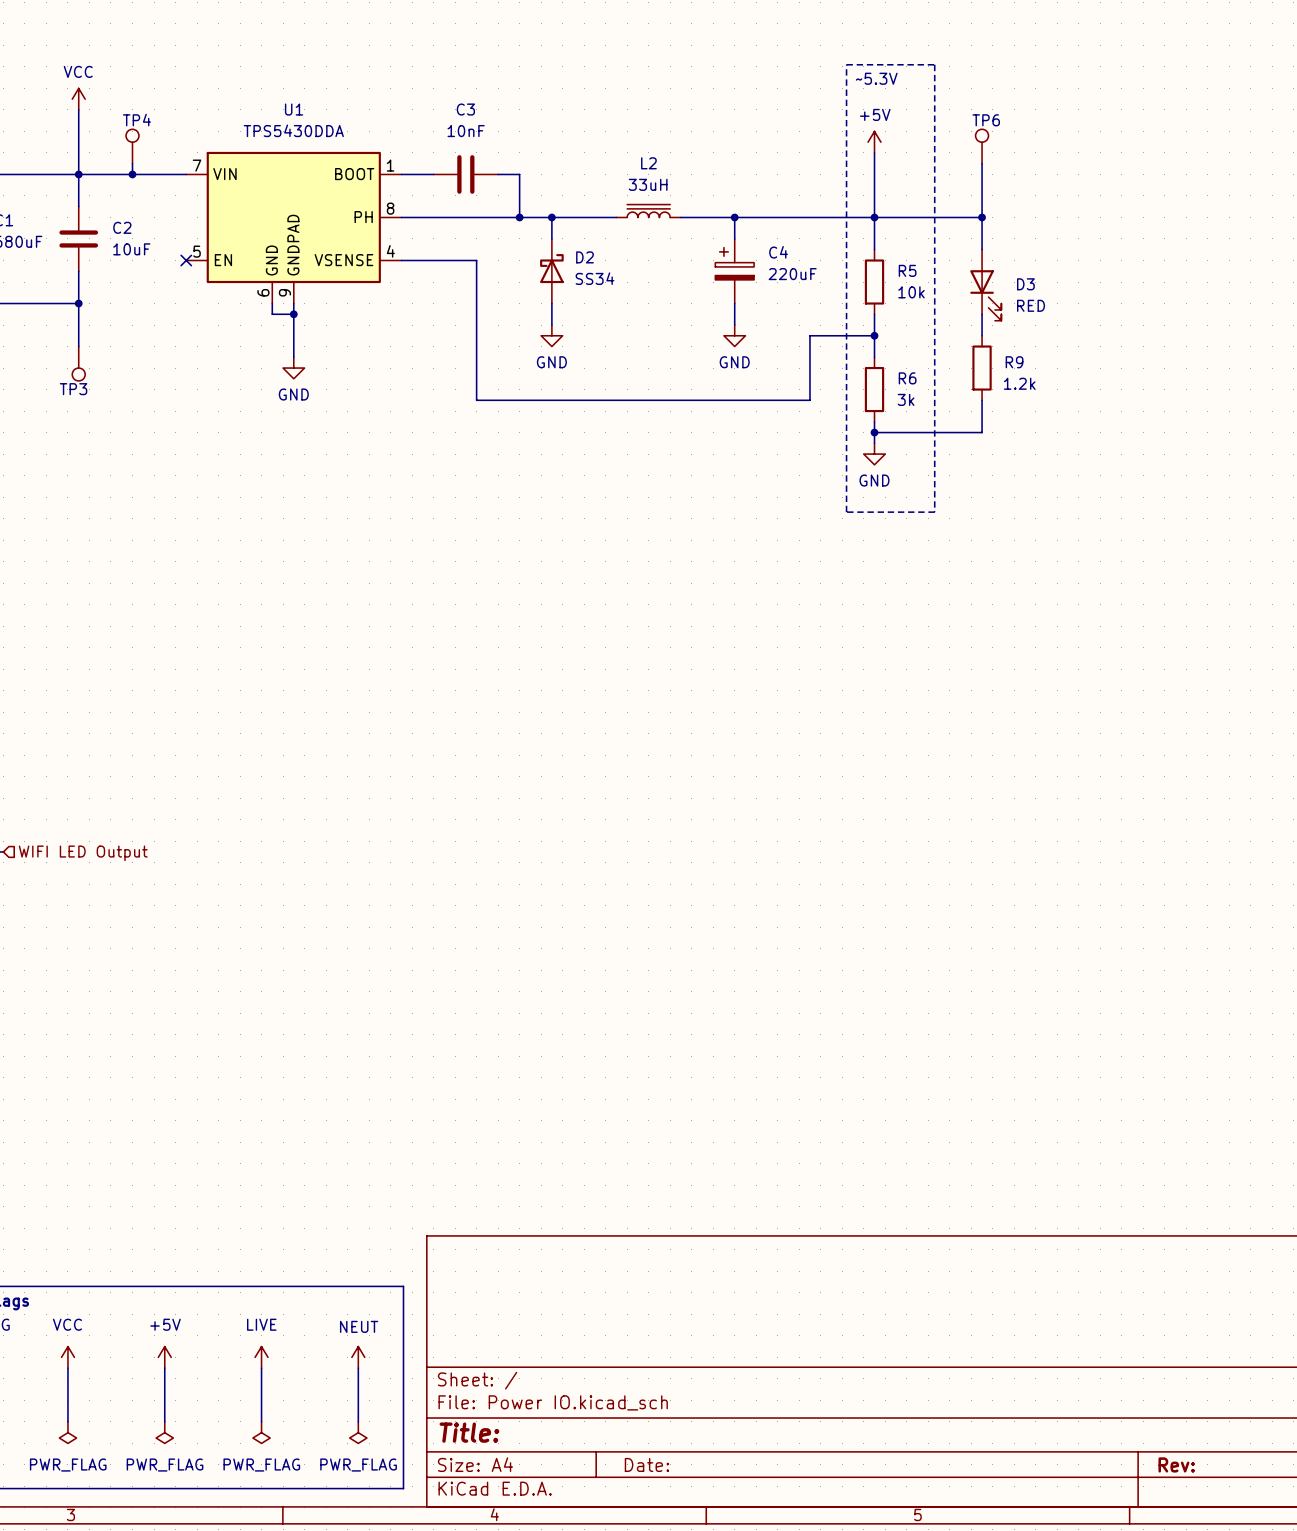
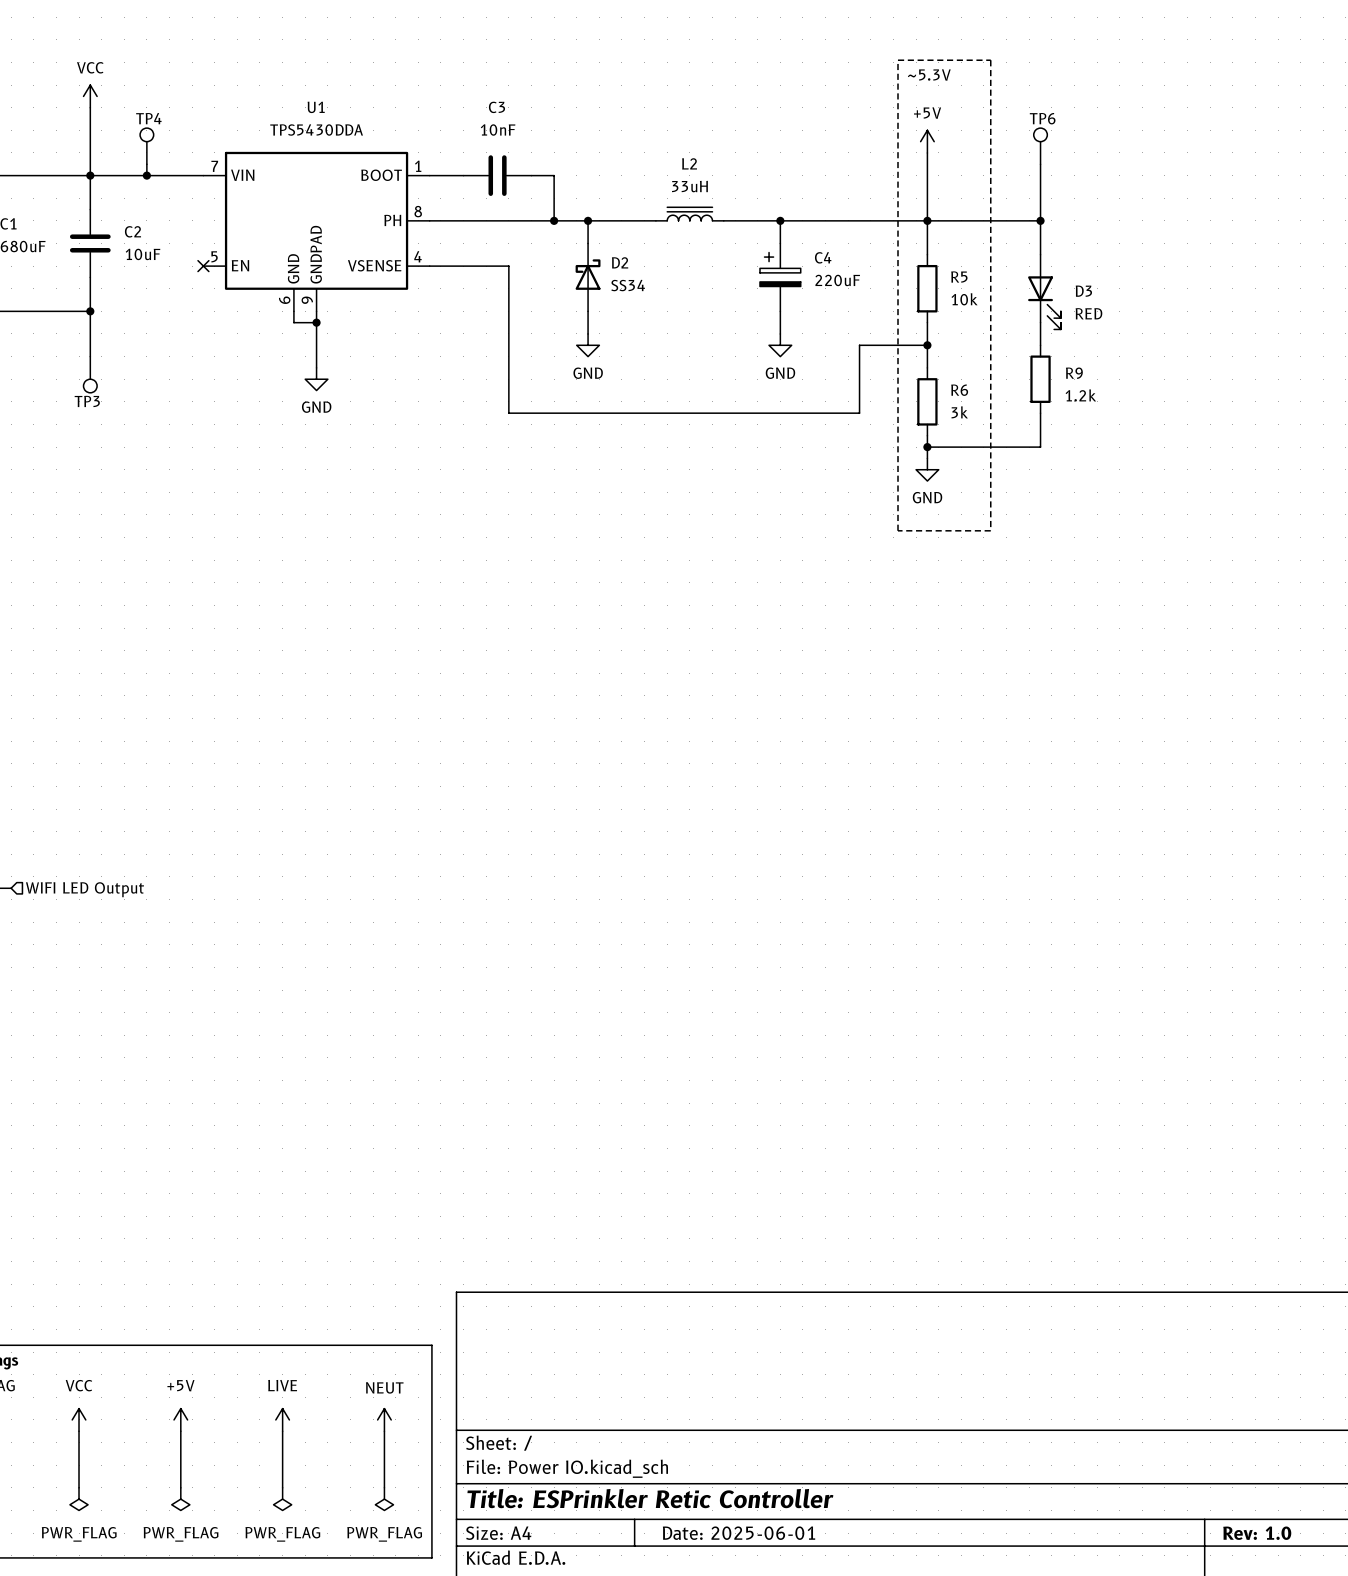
title block: Title: (469, 1432) -> Title: ESPrinkler Retic Controller (650, 1498)
title block: Date: (646, 1464) -> Date: 2025-06-01 (739, 1533)
title block: Rev: (1176, 1464) -> Rev: 1.0 (1257, 1533)

